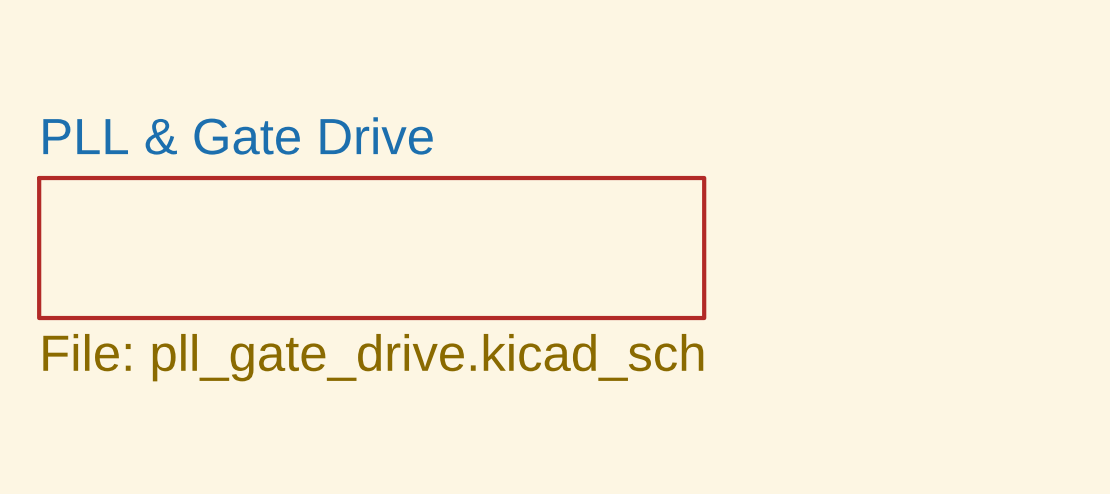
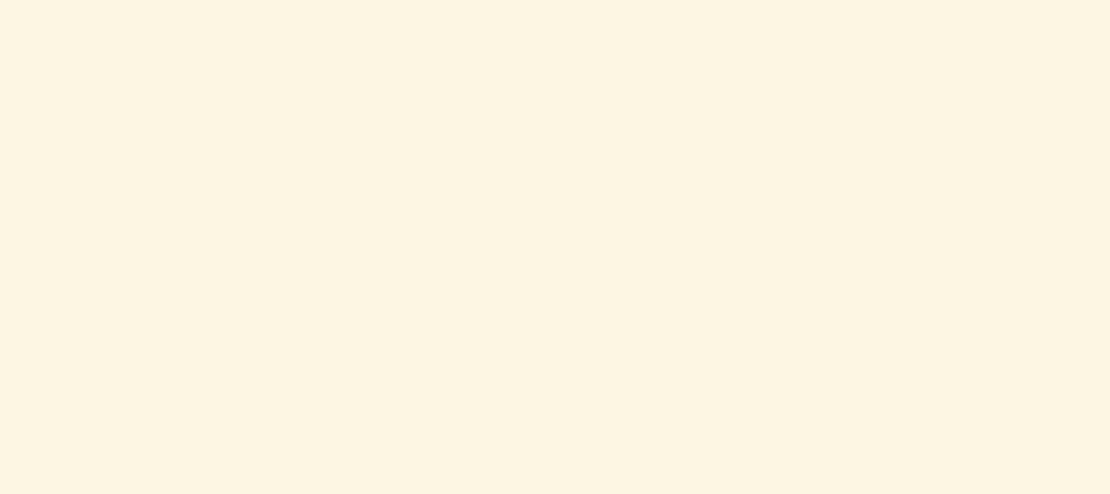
sheet PLL & Gate Drive: File: pll_gate_drive.kicad_sch (371, 248) -> none

